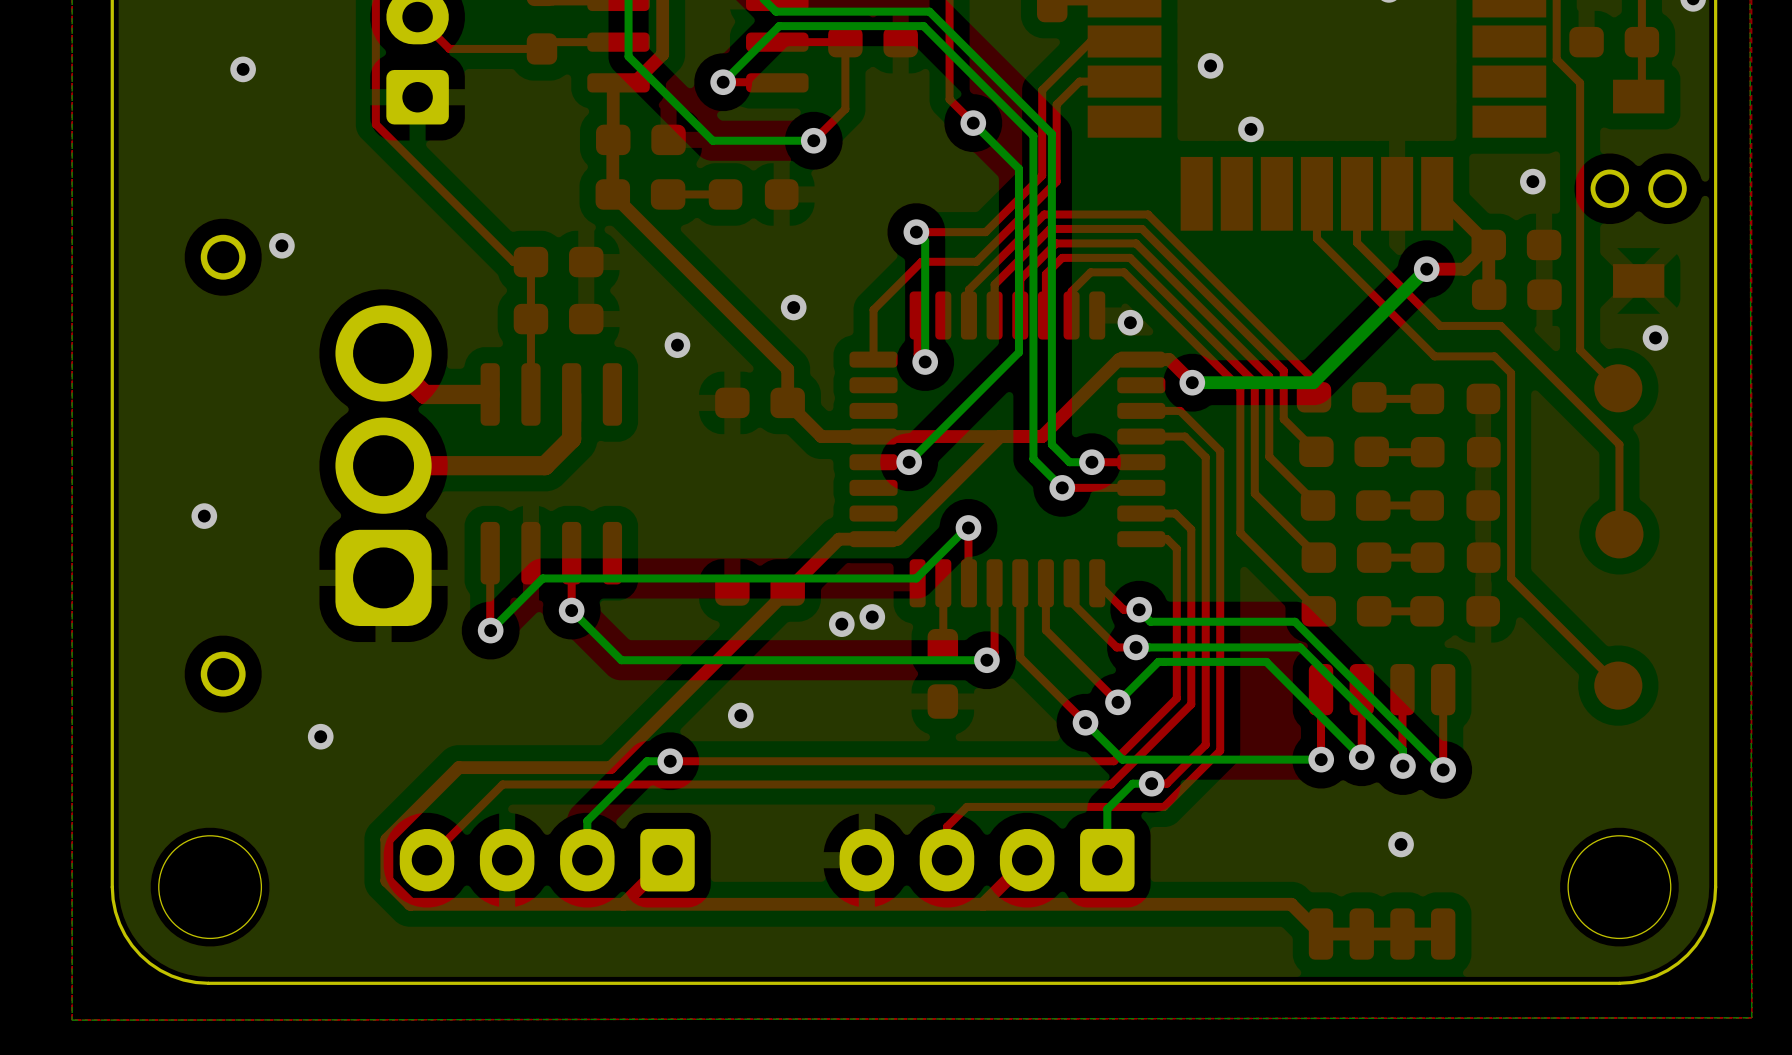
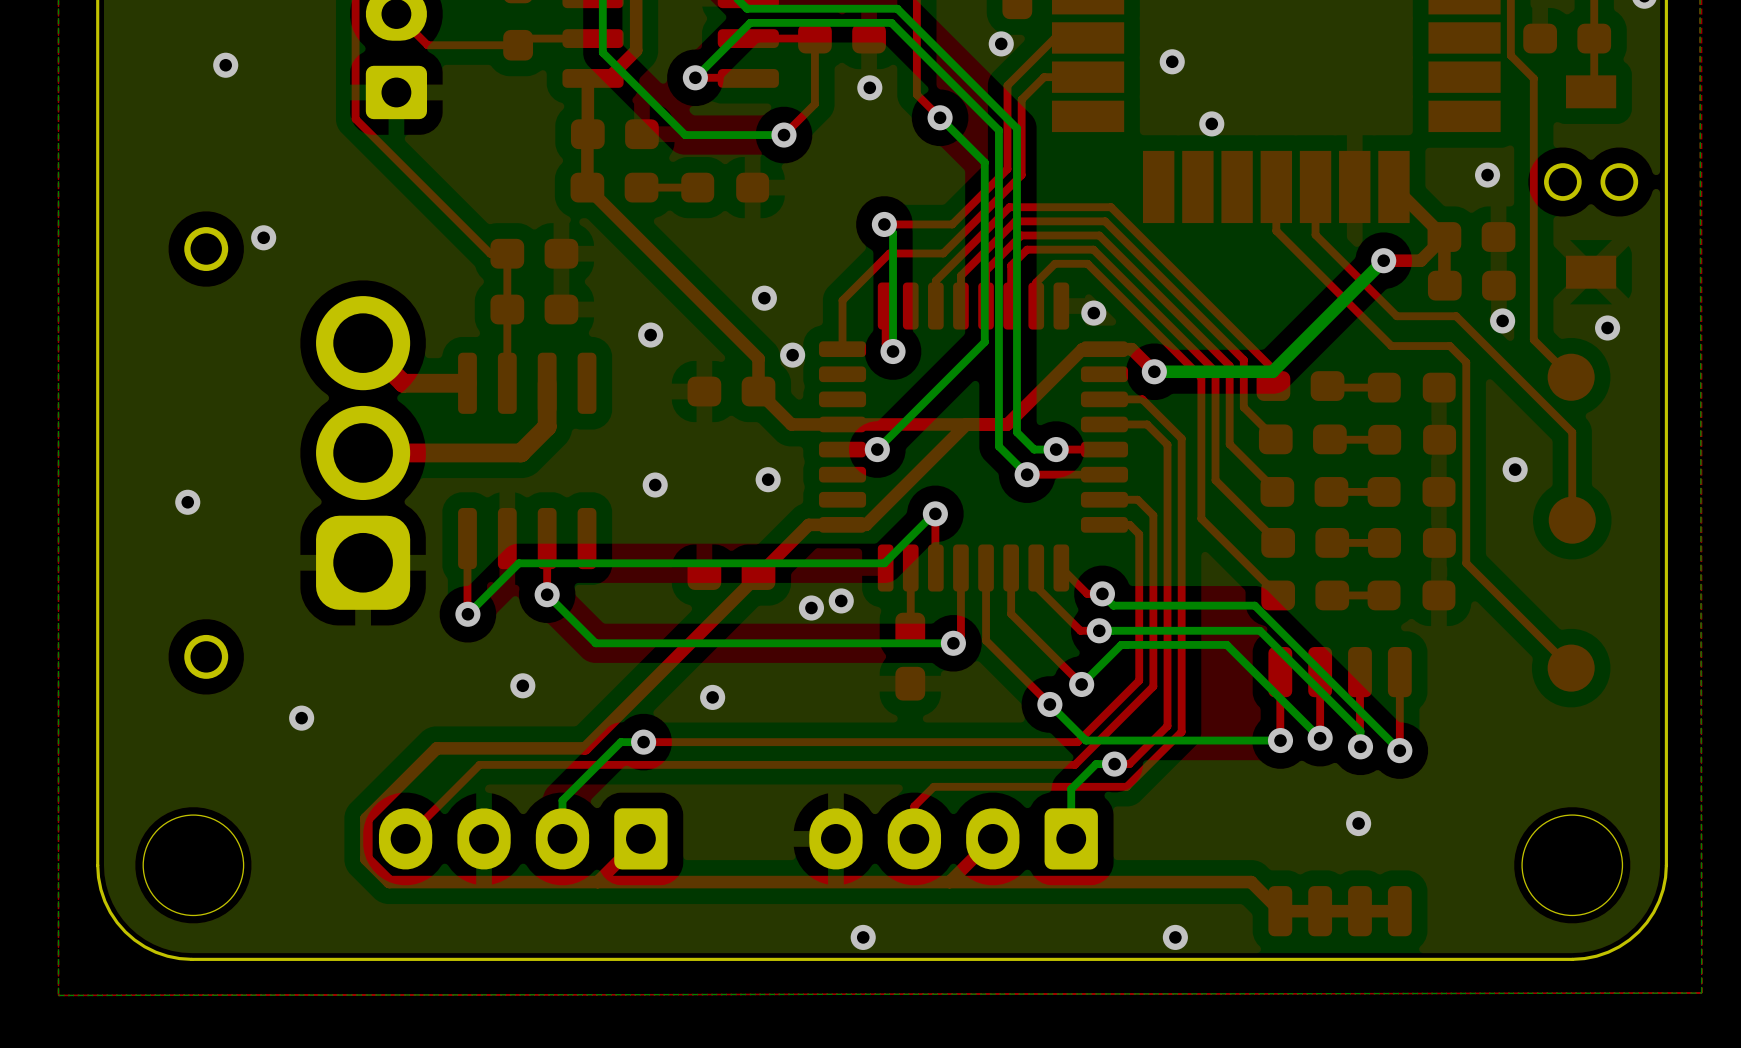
via: none -> (1001, 43)
via: none -> (869, 87)
via: none -> (1502, 320)
via: none -> (792, 355)
via: none -> (1515, 469)
via: none -> (768, 479)
via: none -> (655, 485)
via: none -> (522, 685)
via: none -> (863, 937)
via: none -> (1175, 937)

